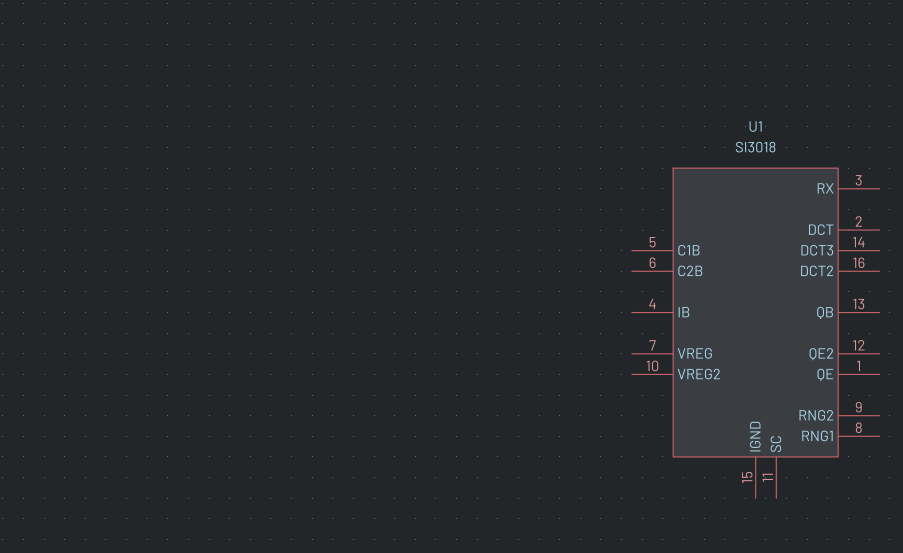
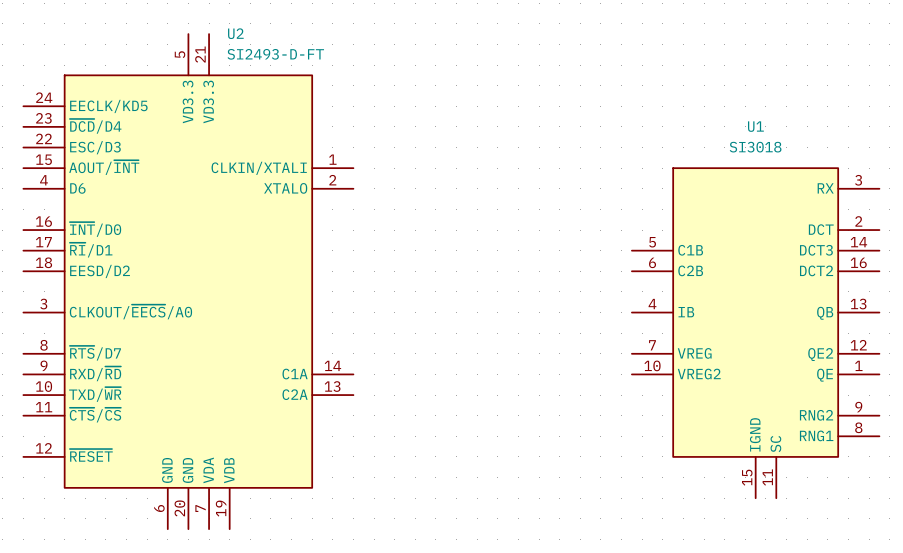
U2: none -> SI2493-D-FT (188, 281)

